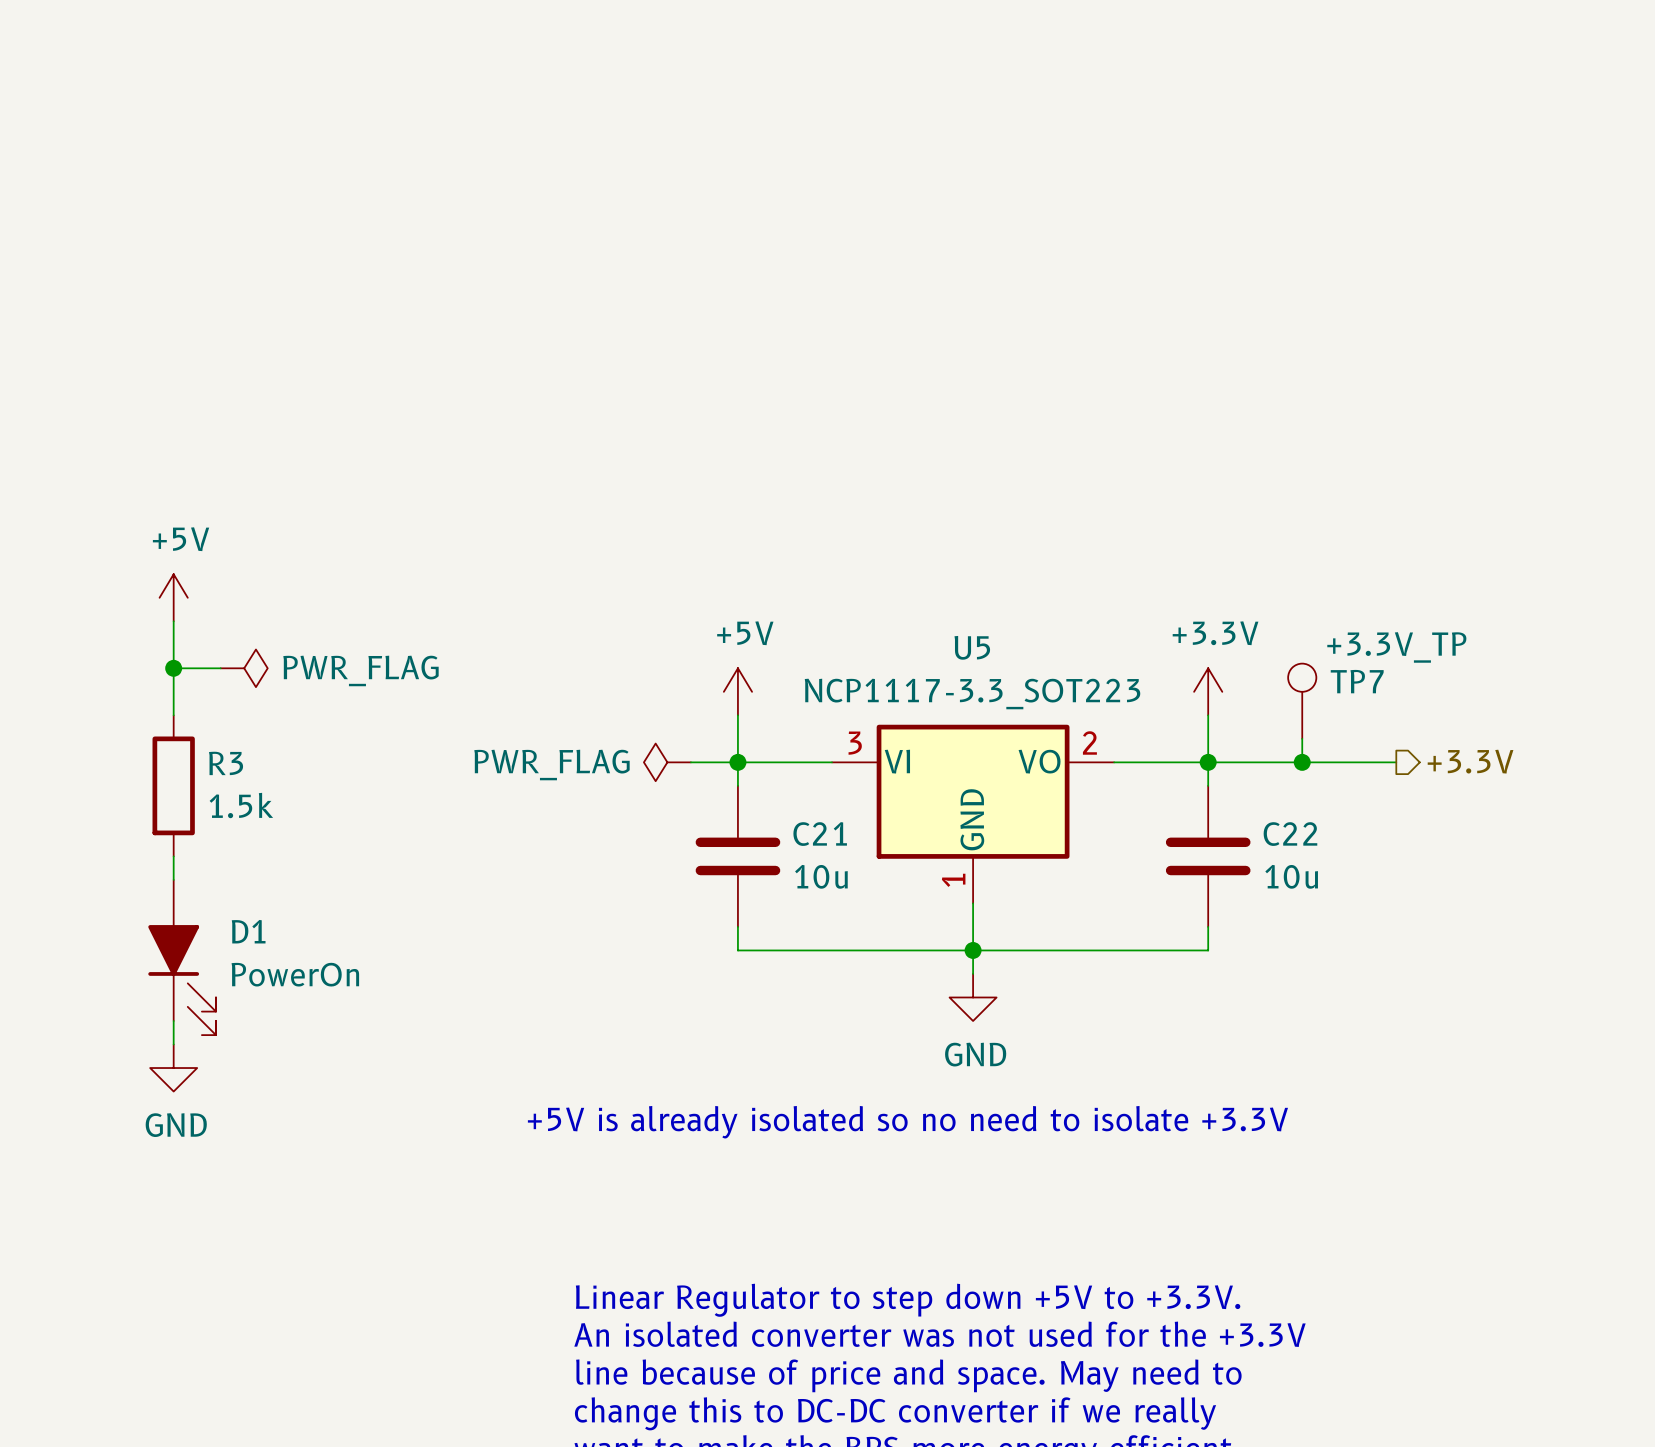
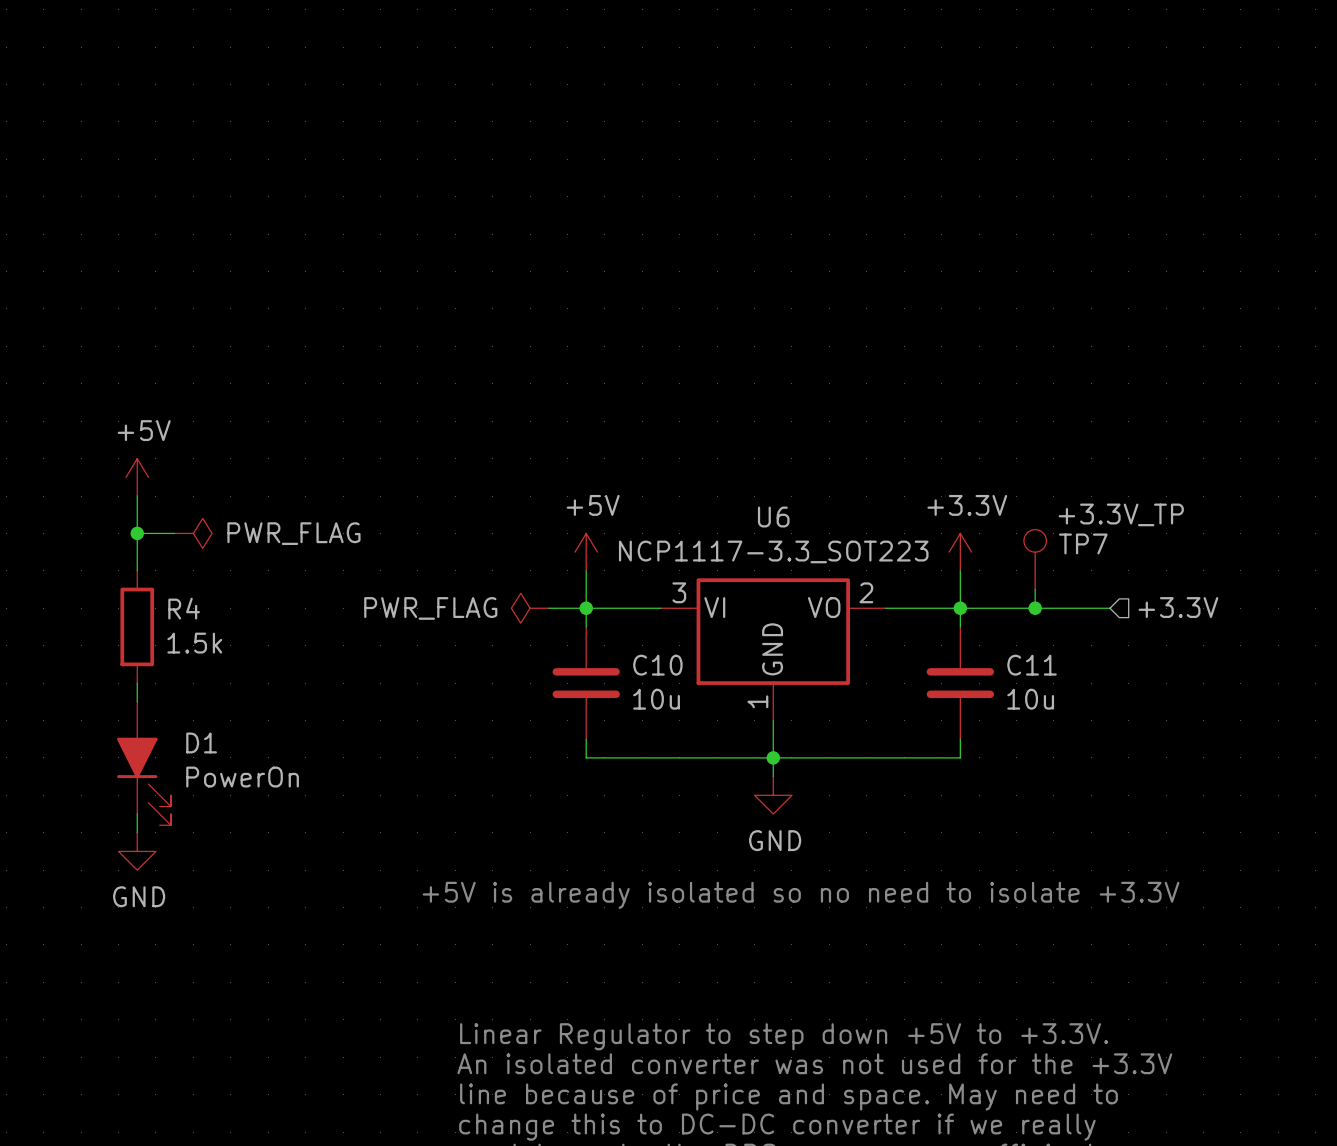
U5 name: U5 (972, 647) -> U6 (773, 517)
hierarchical label shape: output (1470, 761) -> input (1178, 607)
R3 name: R3 (226, 763) -> R4 (184, 608)
C21 name: C21 (820, 834) -> C10 (657, 665)
C22 name: C22 (1290, 834) -> C11 (1032, 665)

